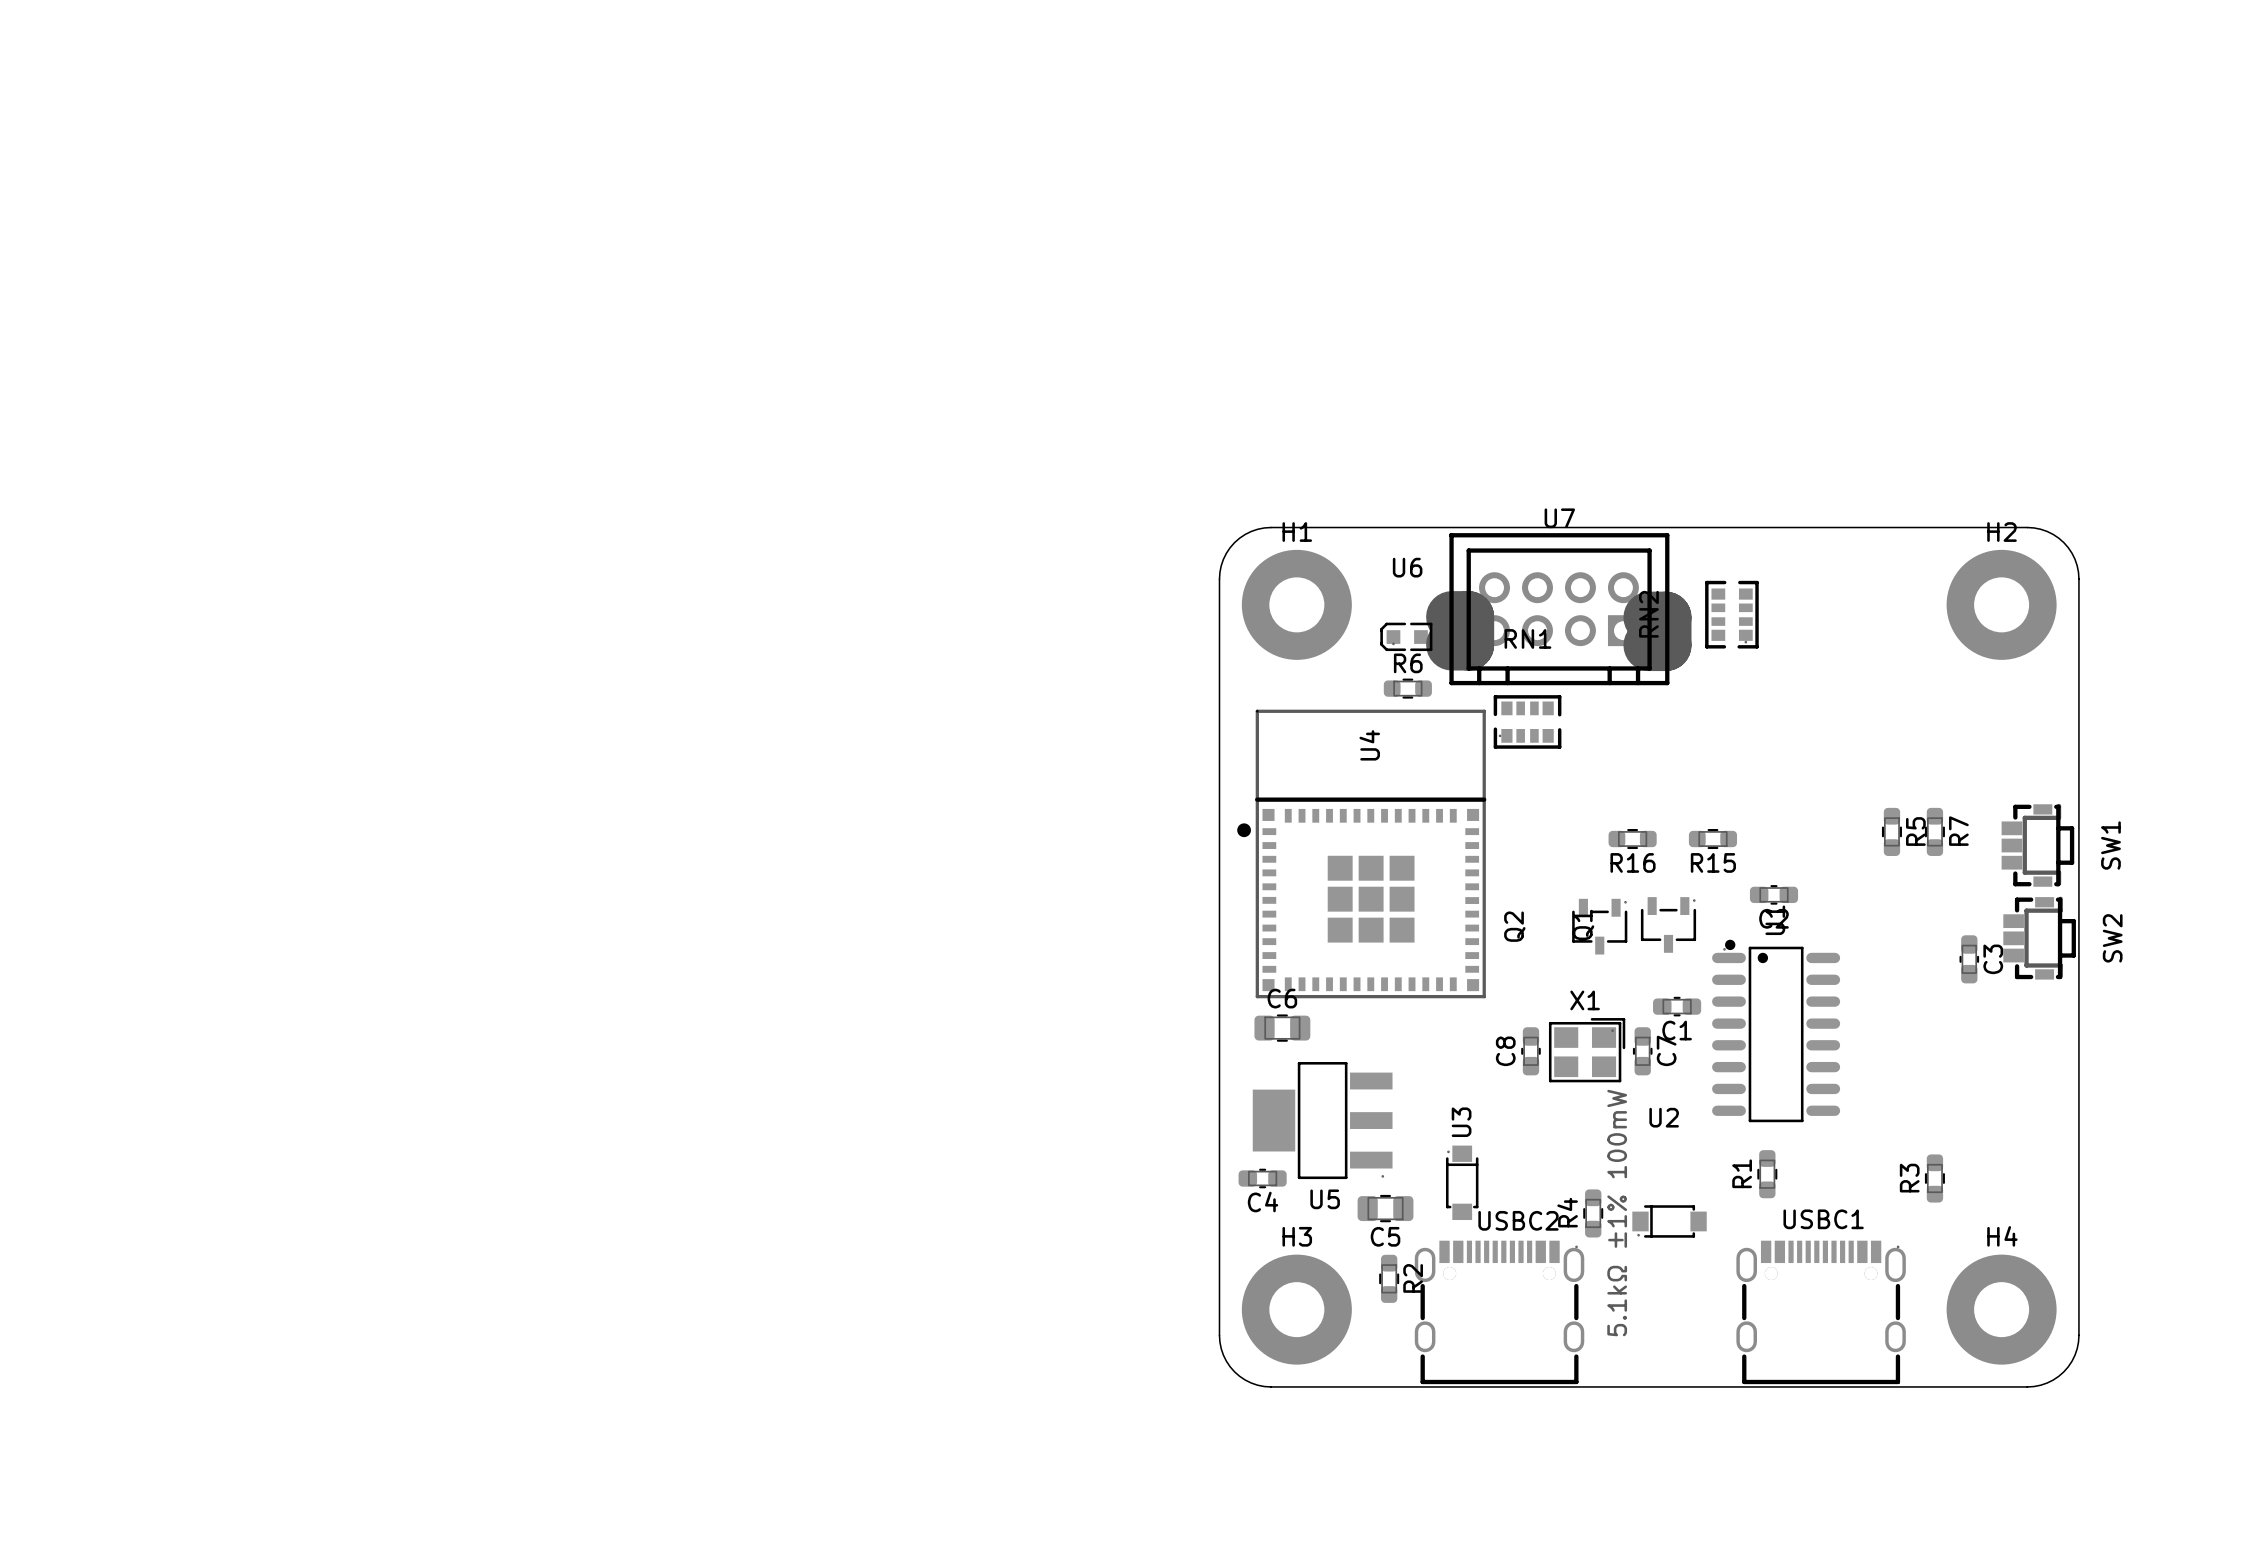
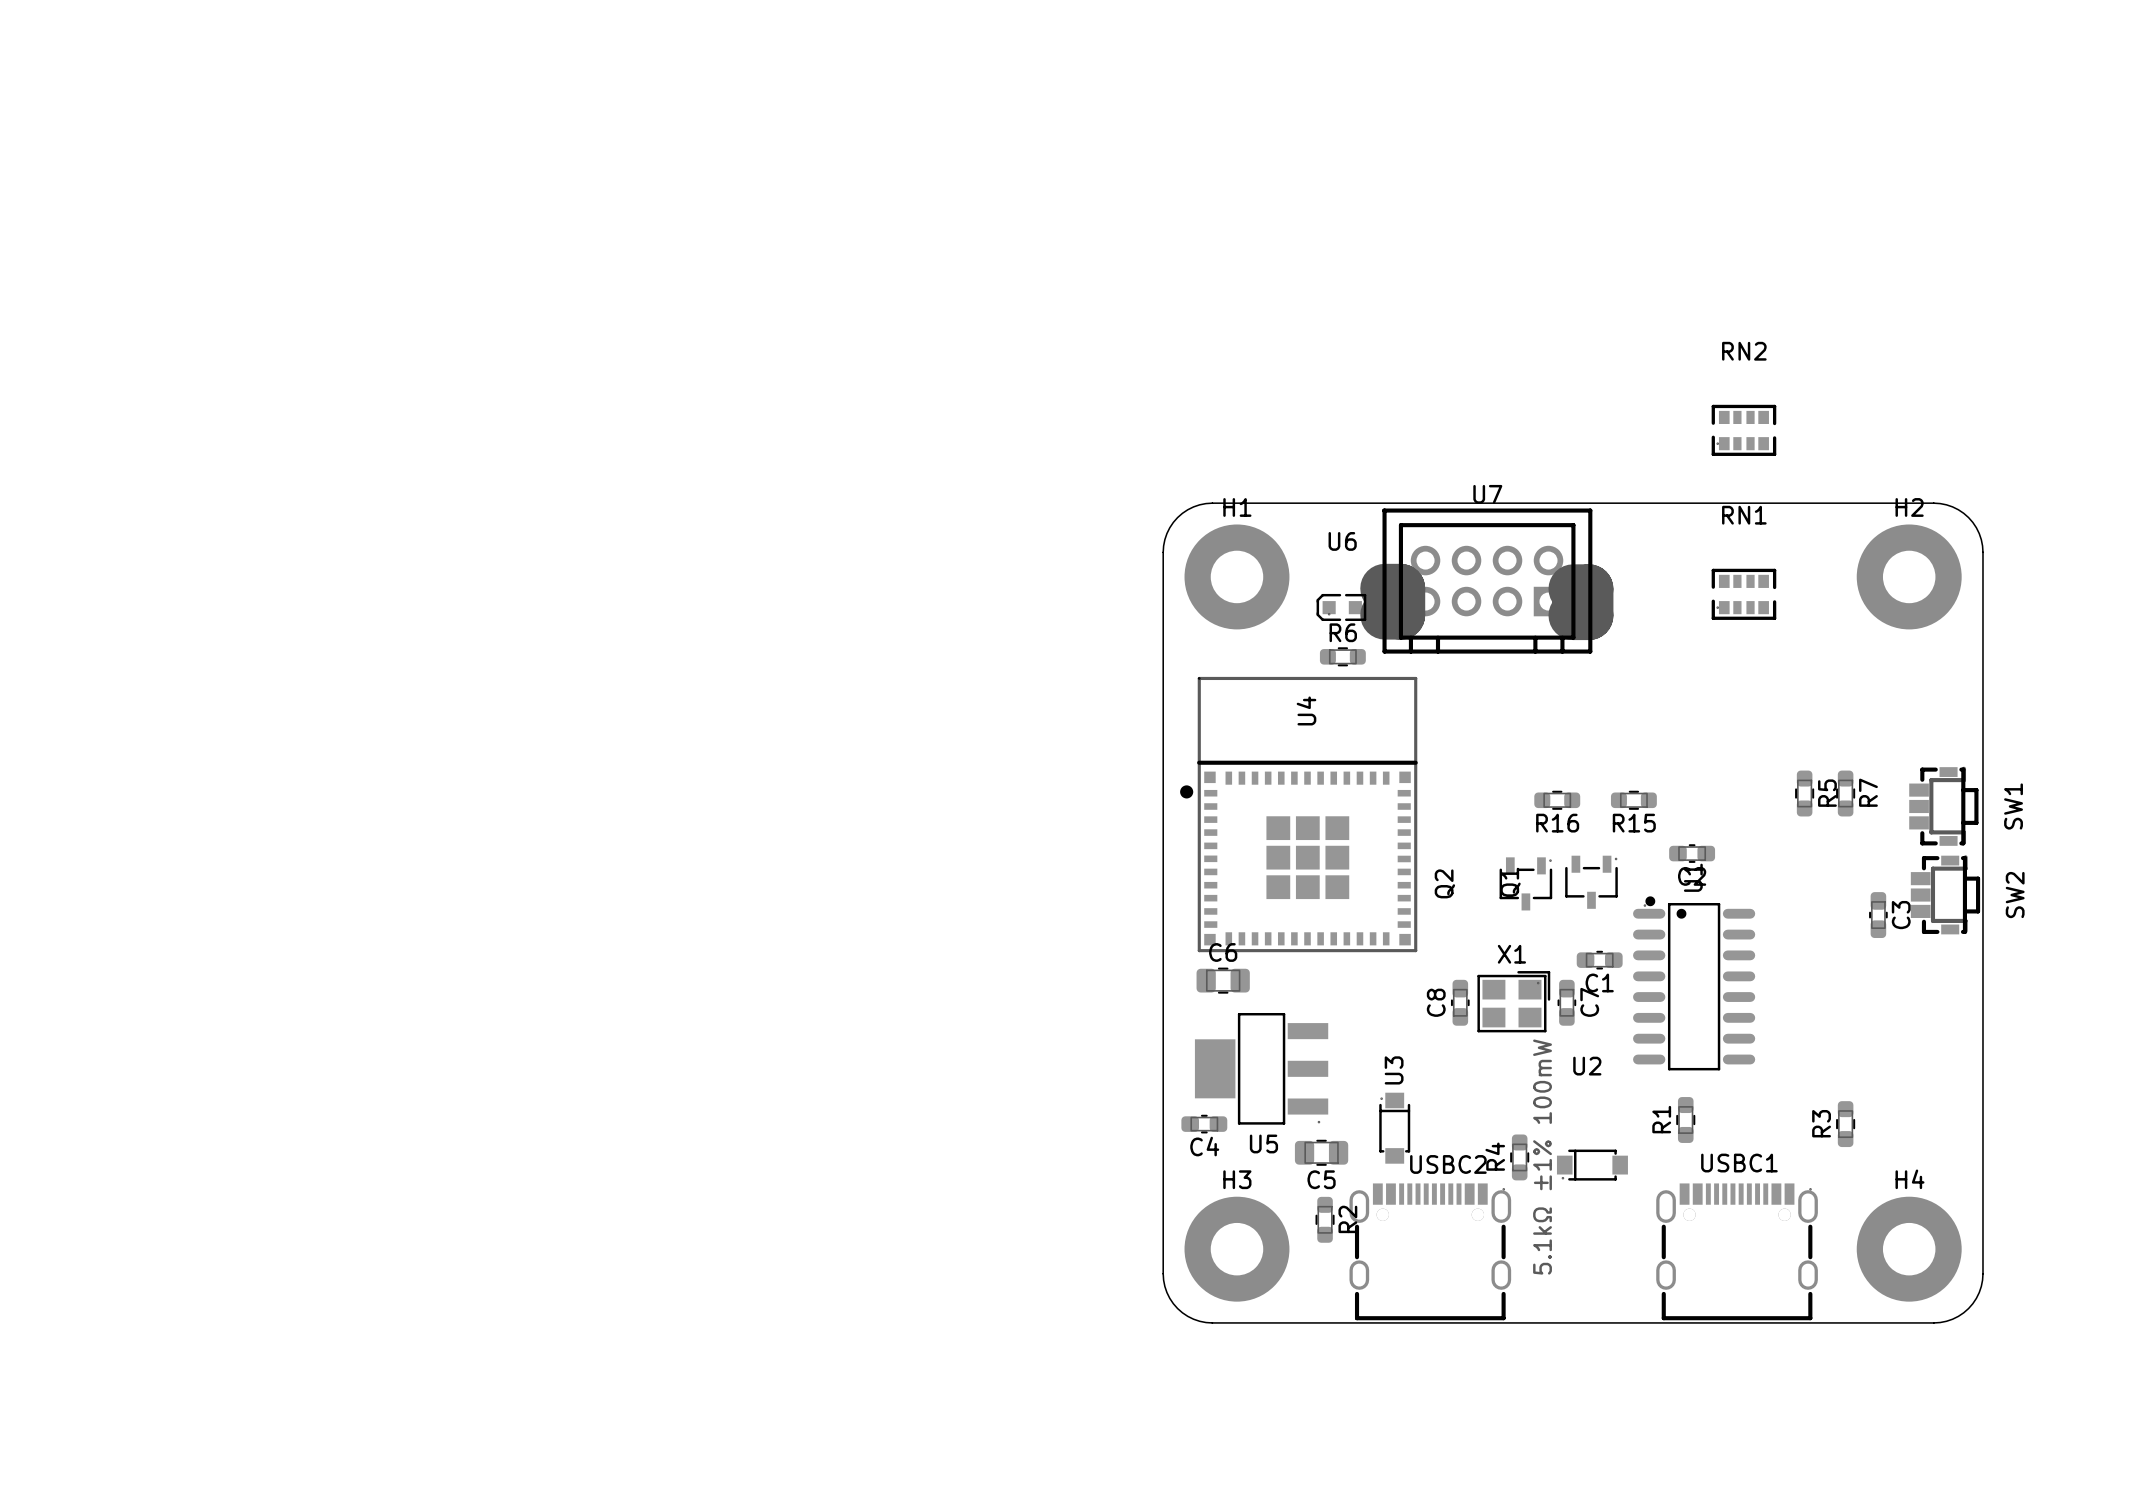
RN2 rotation: 0° (1731, 614) -> 90° clockwise (1743, 430)
RN2 position: (1731, 614) -> (1743, 430)
RN1 position: (1527, 721) -> (1743, 594)

